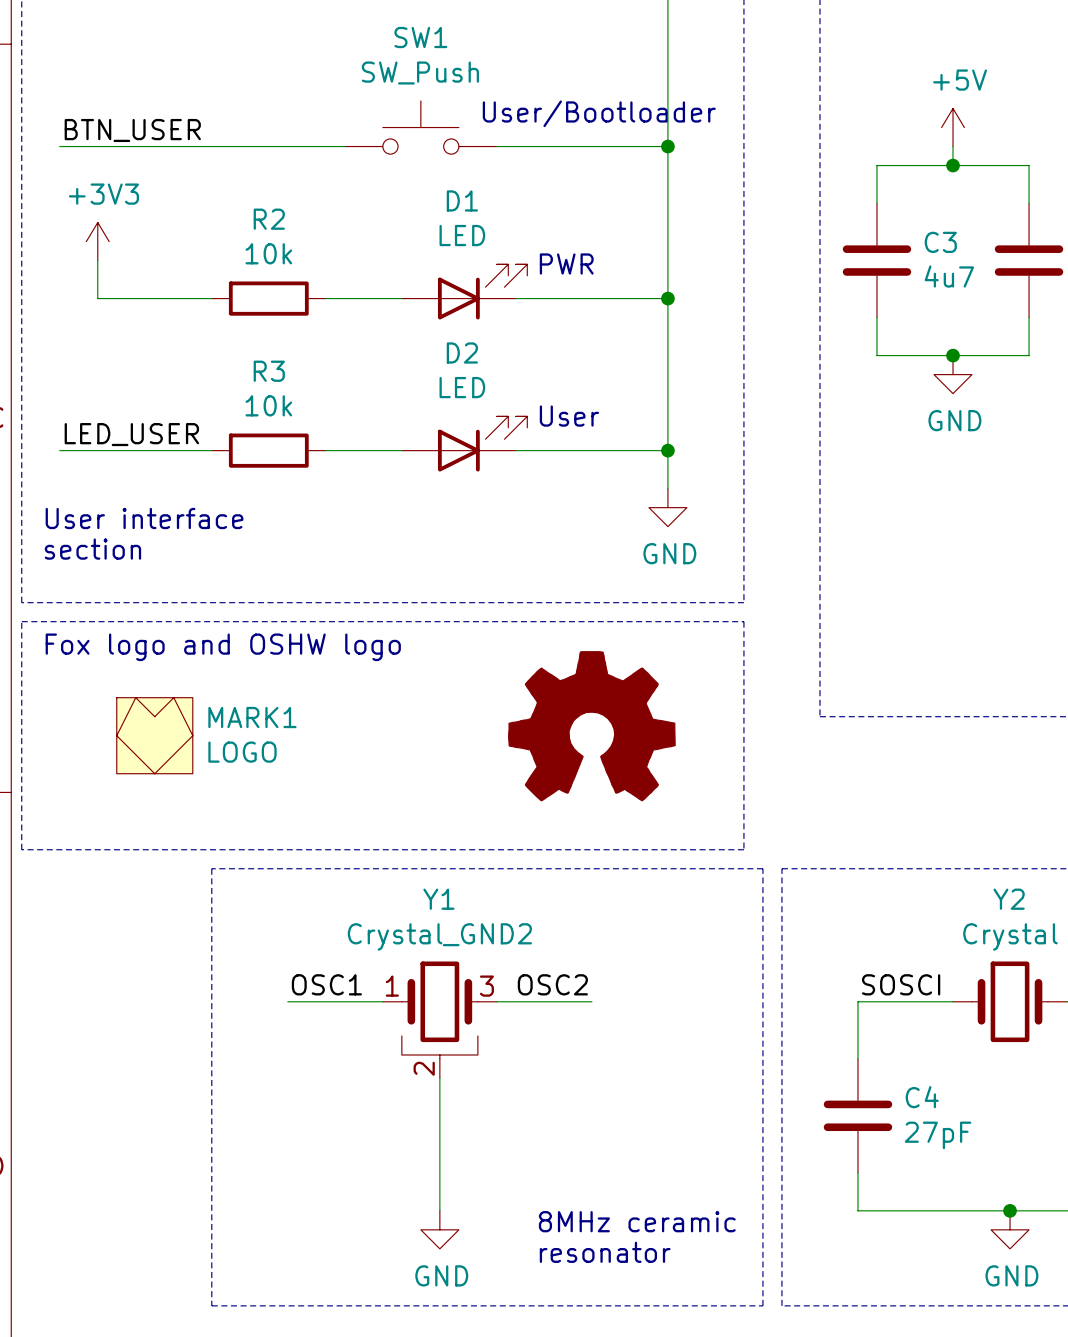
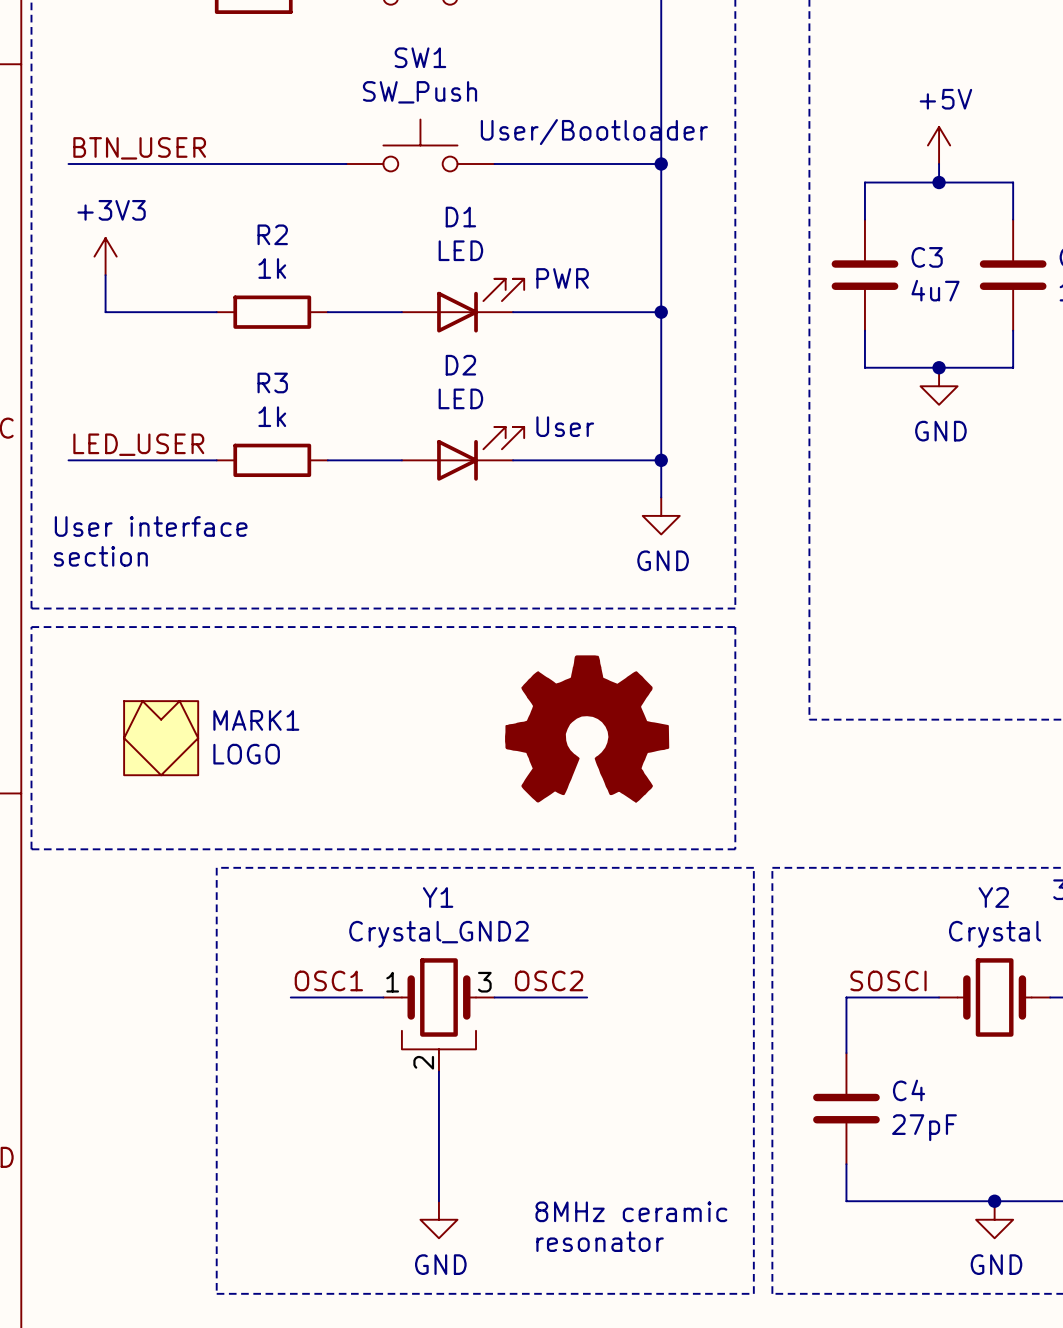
R2 value: 10k (268, 253) -> 1k (272, 268)
R3 value: 10k (268, 405) -> 1k (272, 416)
text: Fox logo and OSHW logo (223, 647) -> none

